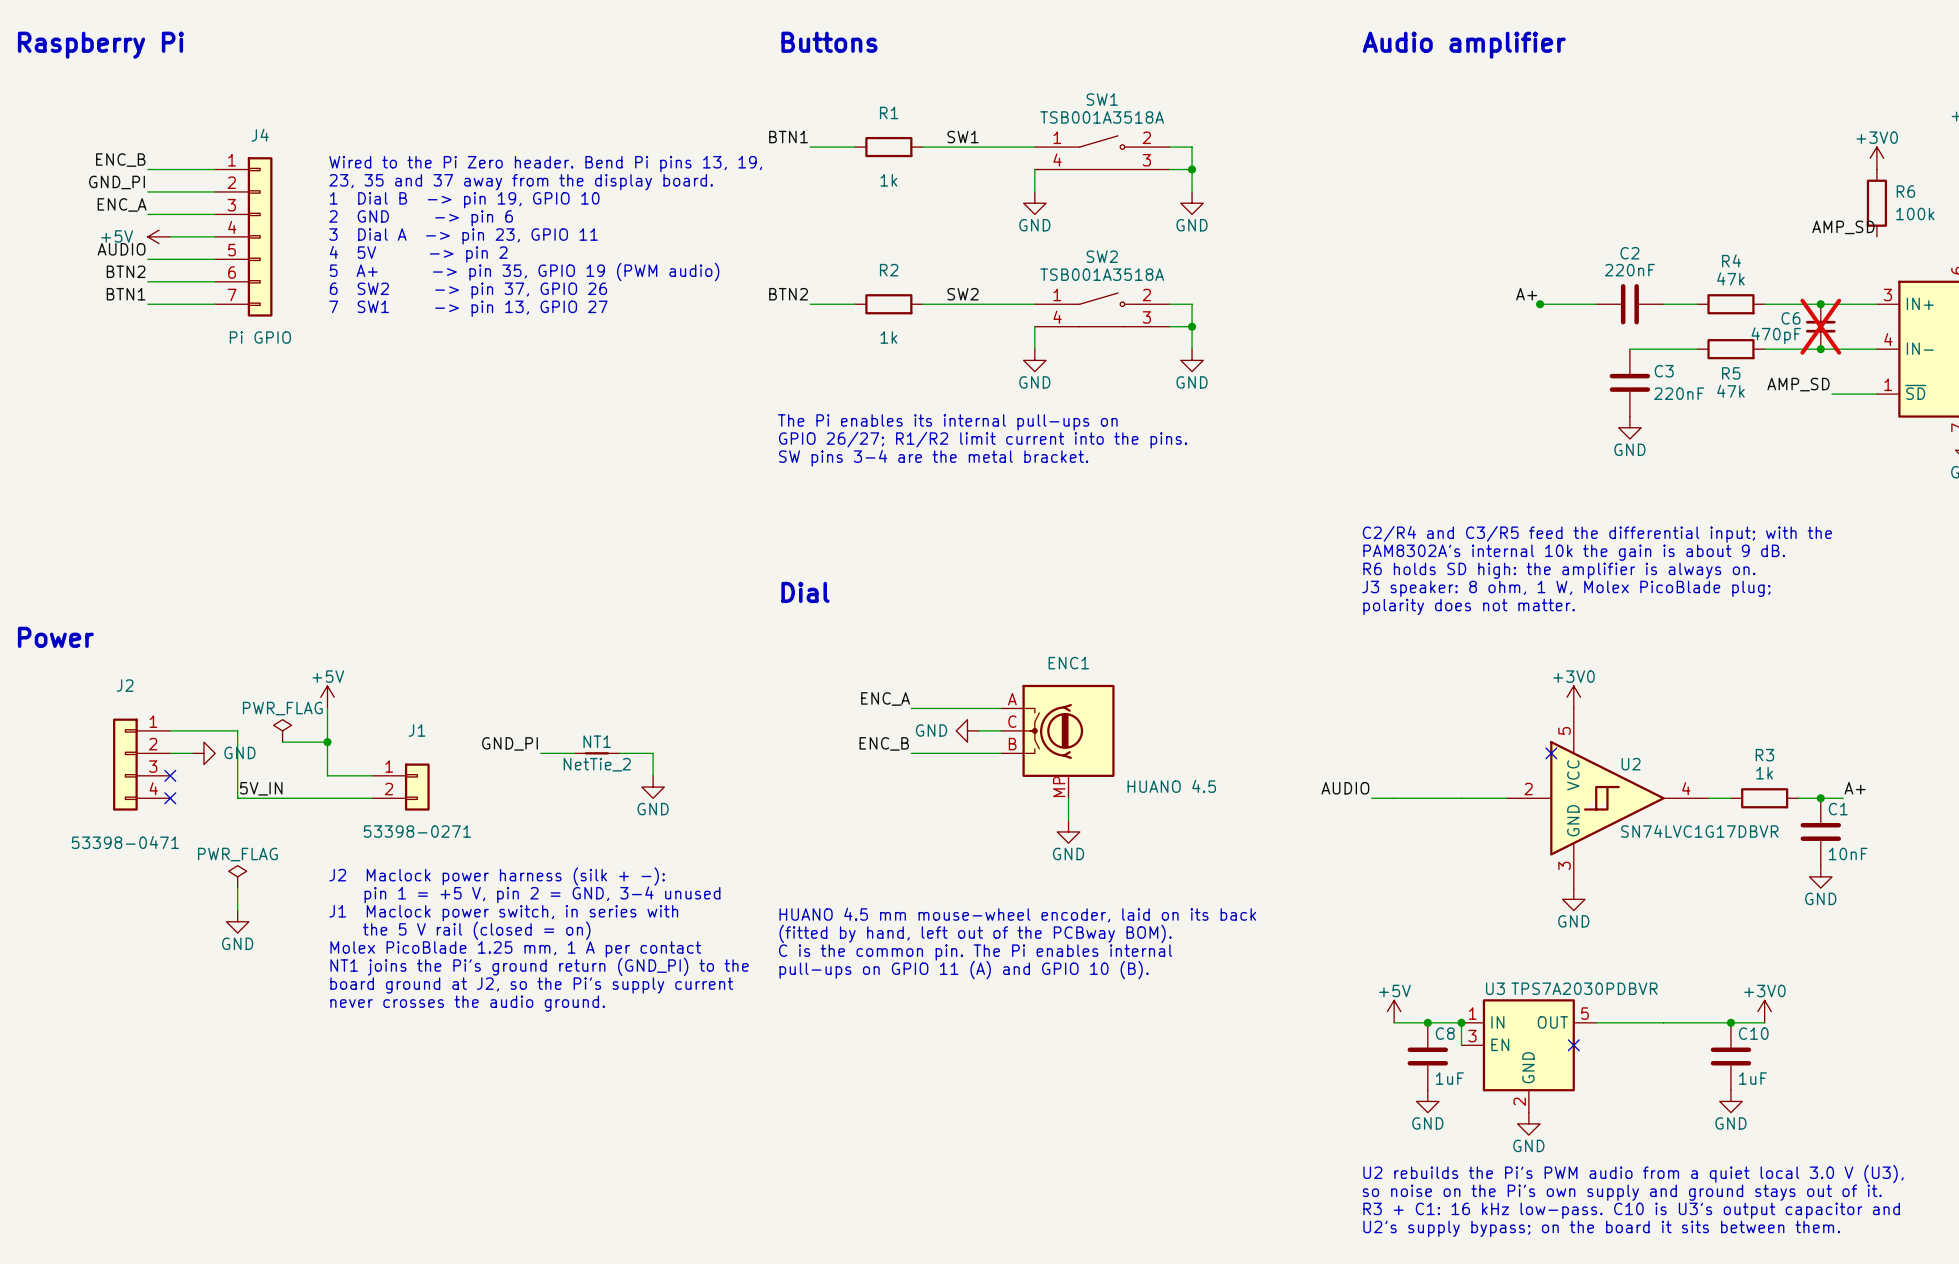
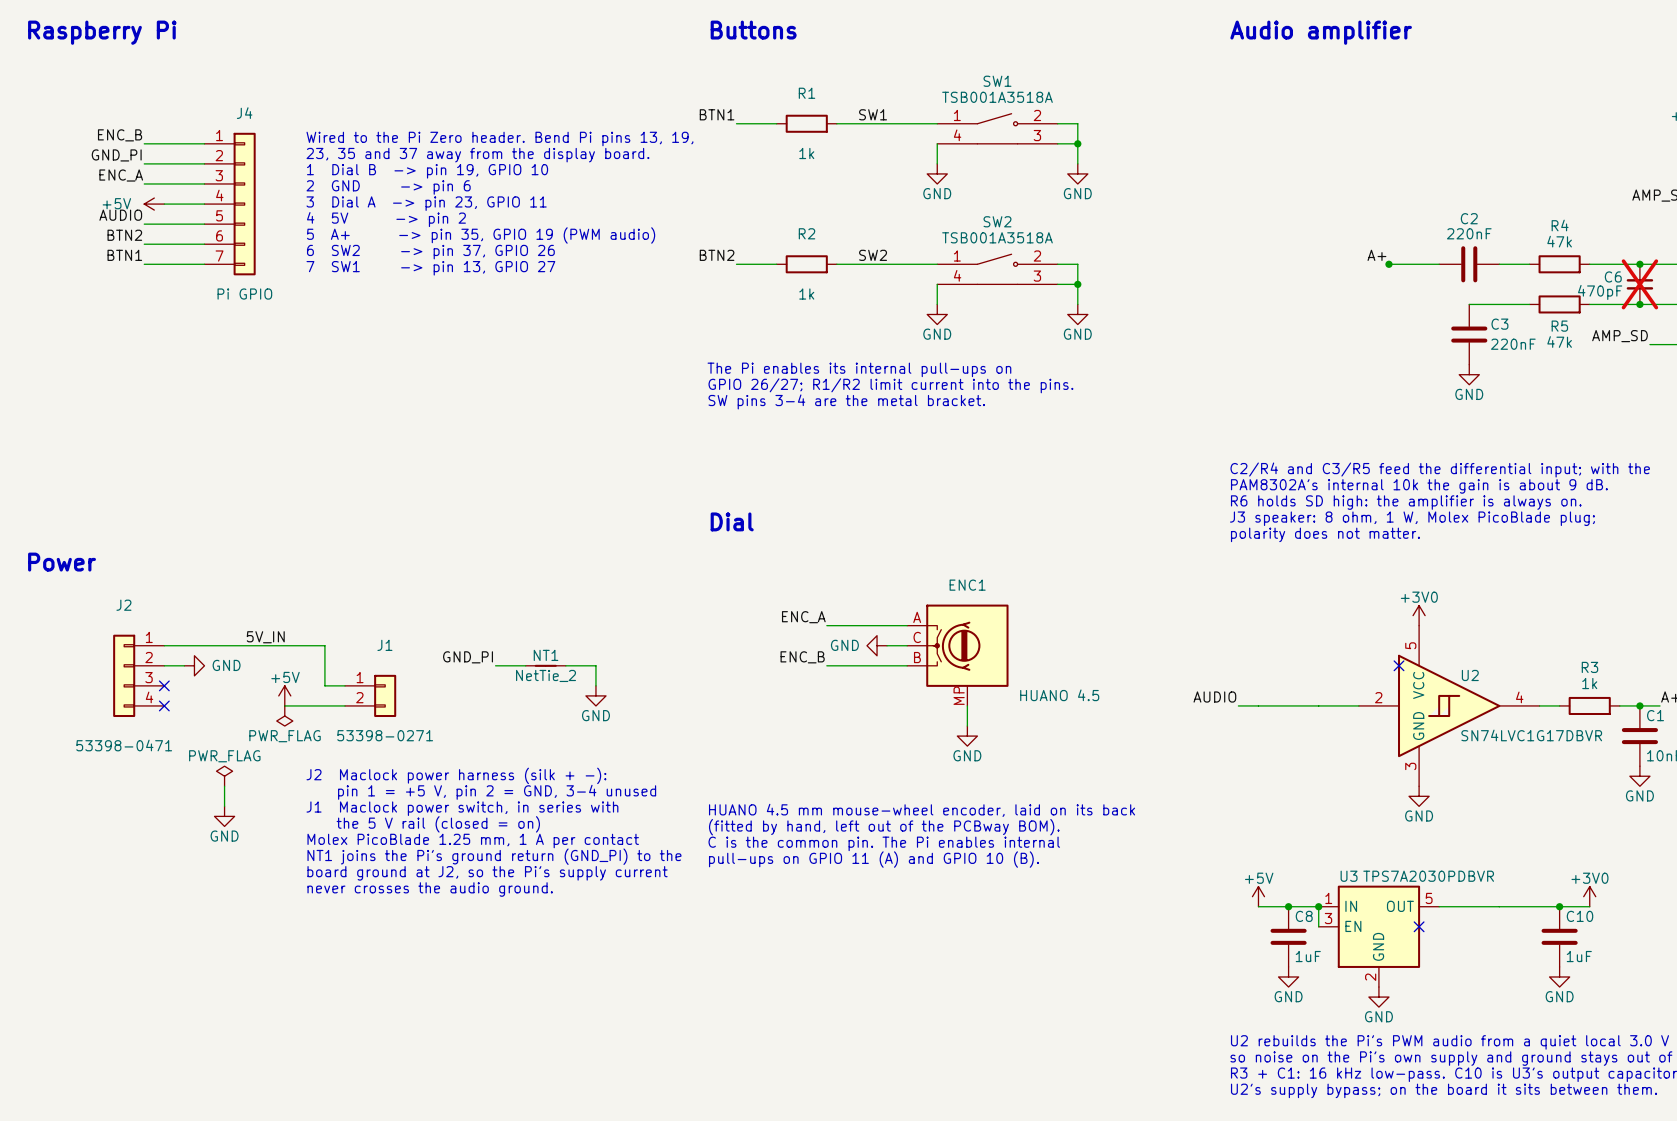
power symbol position: +5V (327, 697) -> +5V (284, 695)
wire: (327, 708) (327, 775) (349, 775) -> none
wire: (237, 730) (237, 798) (305, 798) -> (224, 645) (324, 645) (324, 685)
power symbol rotation: 0° (282, 730) -> 180° (284, 716)
power symbol position: PWR_FLAG (282, 730) -> PWR_FLAG (284, 716)
wire: (282, 742) (327, 742) -> none
junction: (327, 742) -> none
label position: 5V_IN (261, 788) -> 5V_IN (265, 637)

